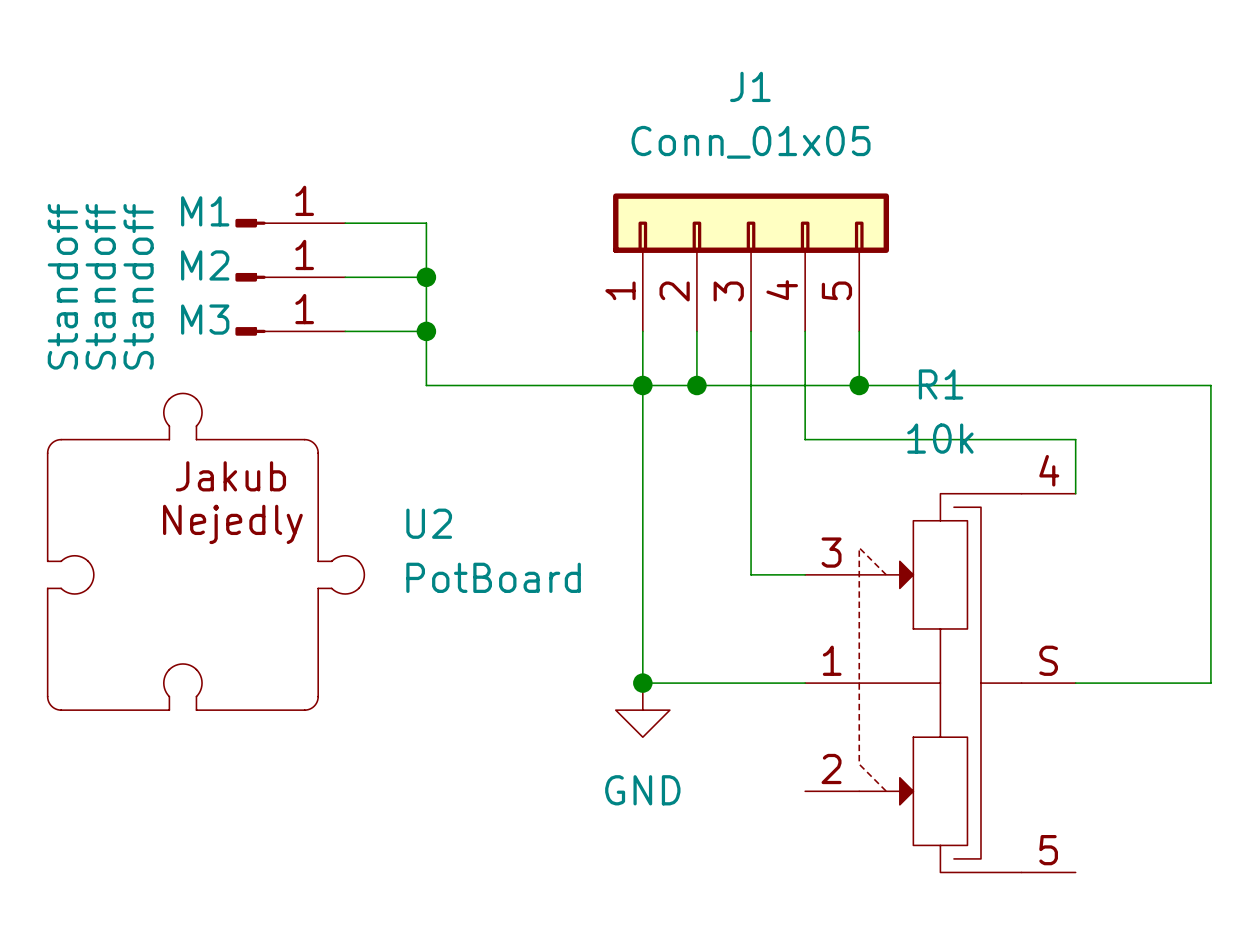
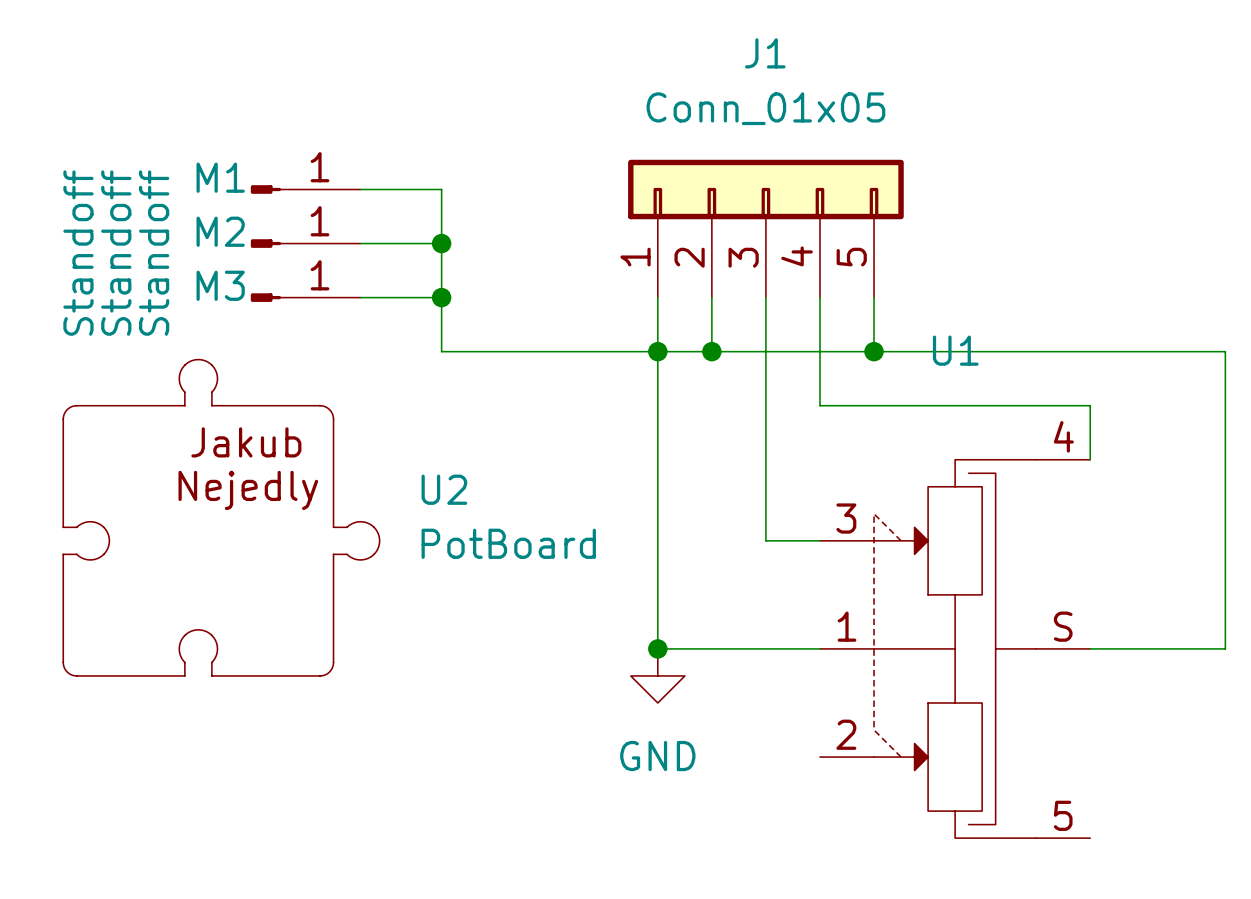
R1 name: R1 (941, 384) -> U1 (955, 350)
R1 value: 10k (940, 438) -> none

